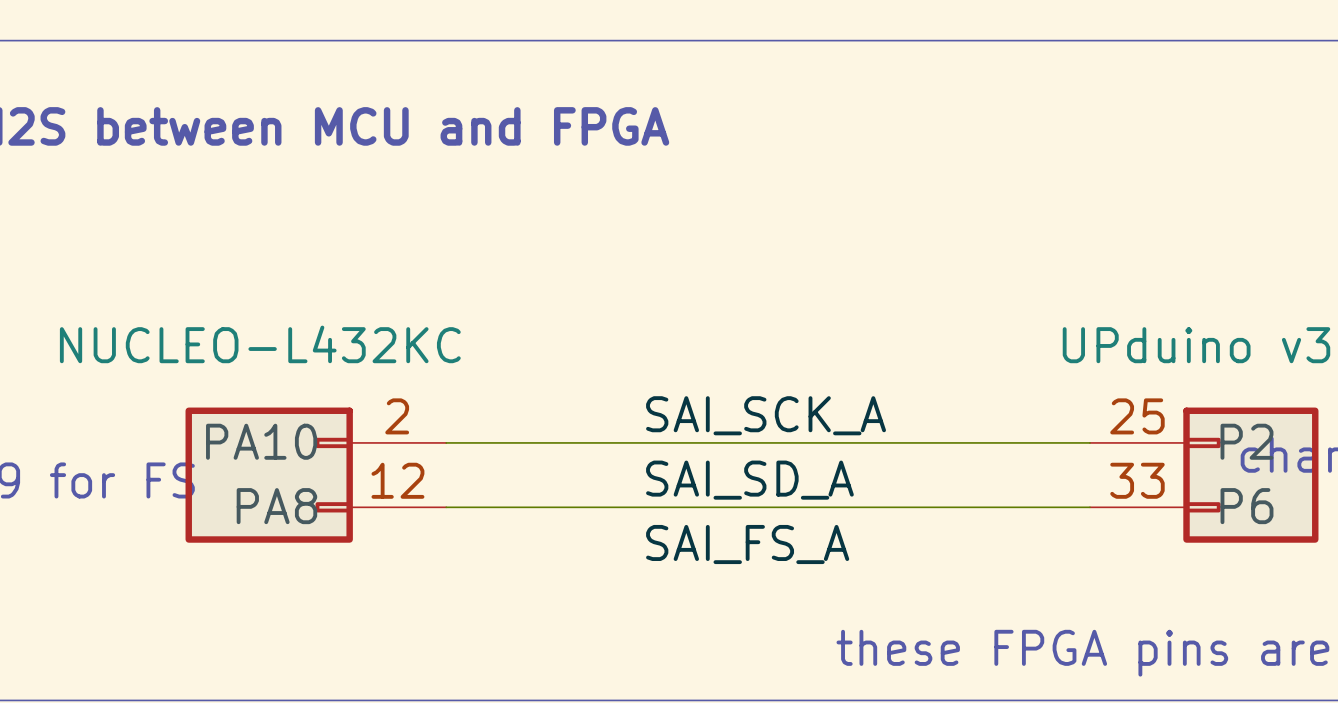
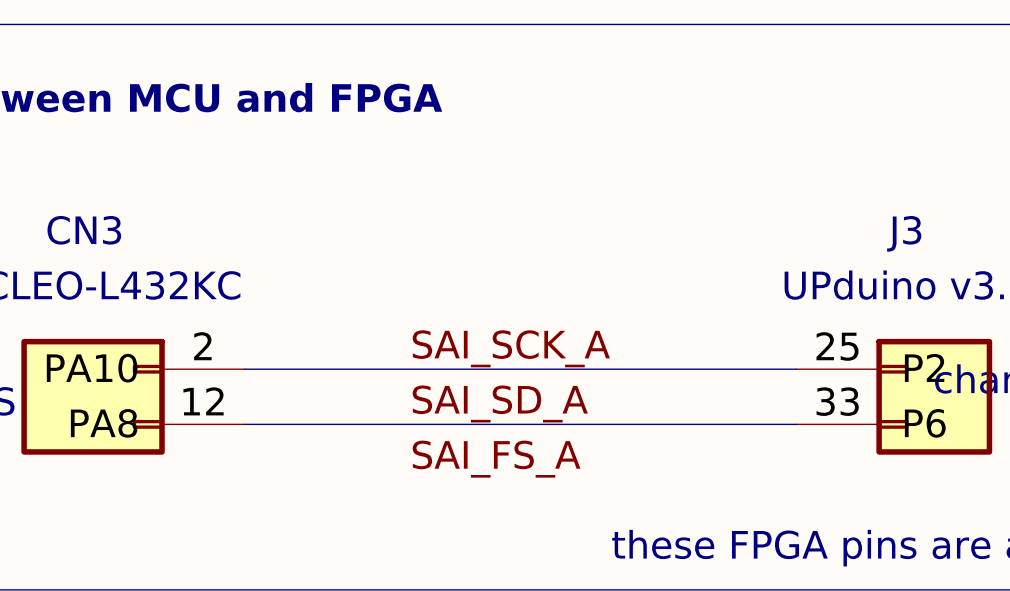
CN3 name: none -> CN3 (84, 230)
J3 name: none -> J3 (904, 233)

